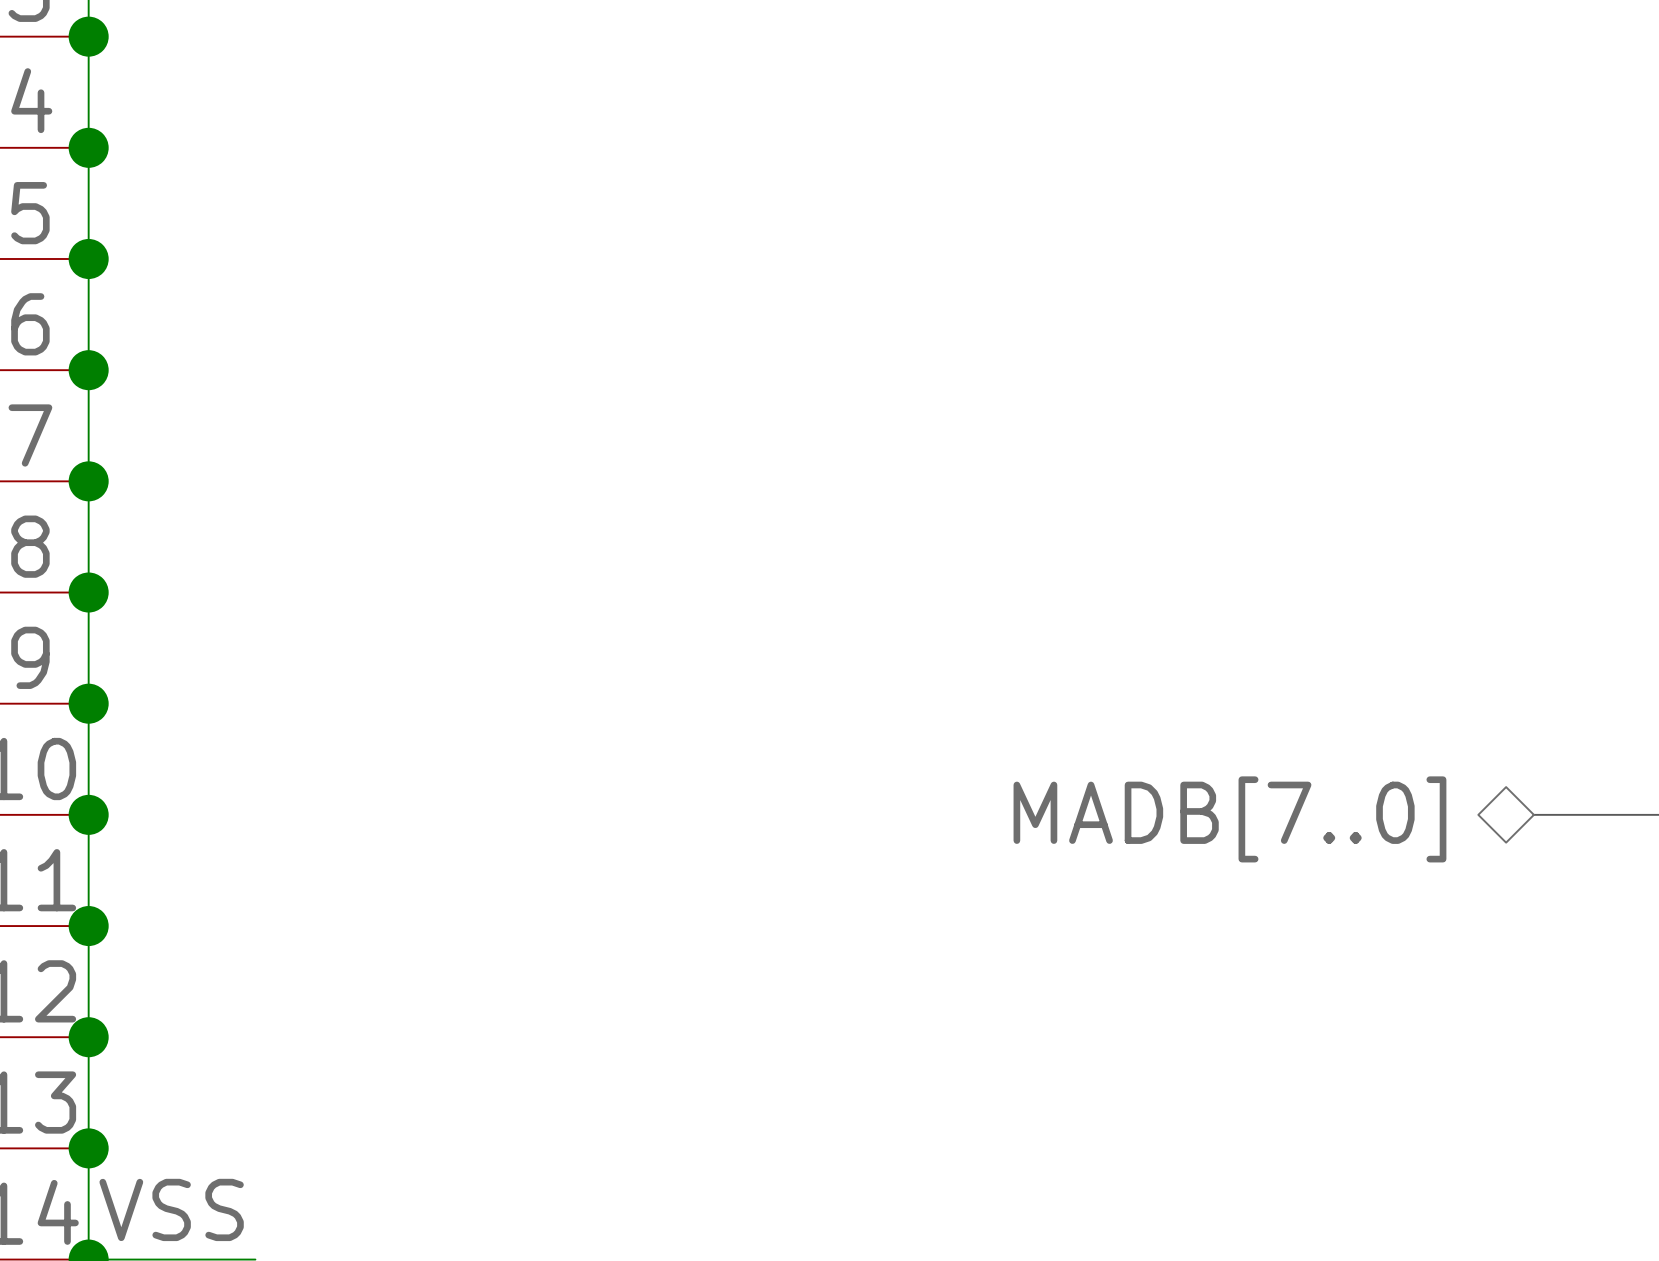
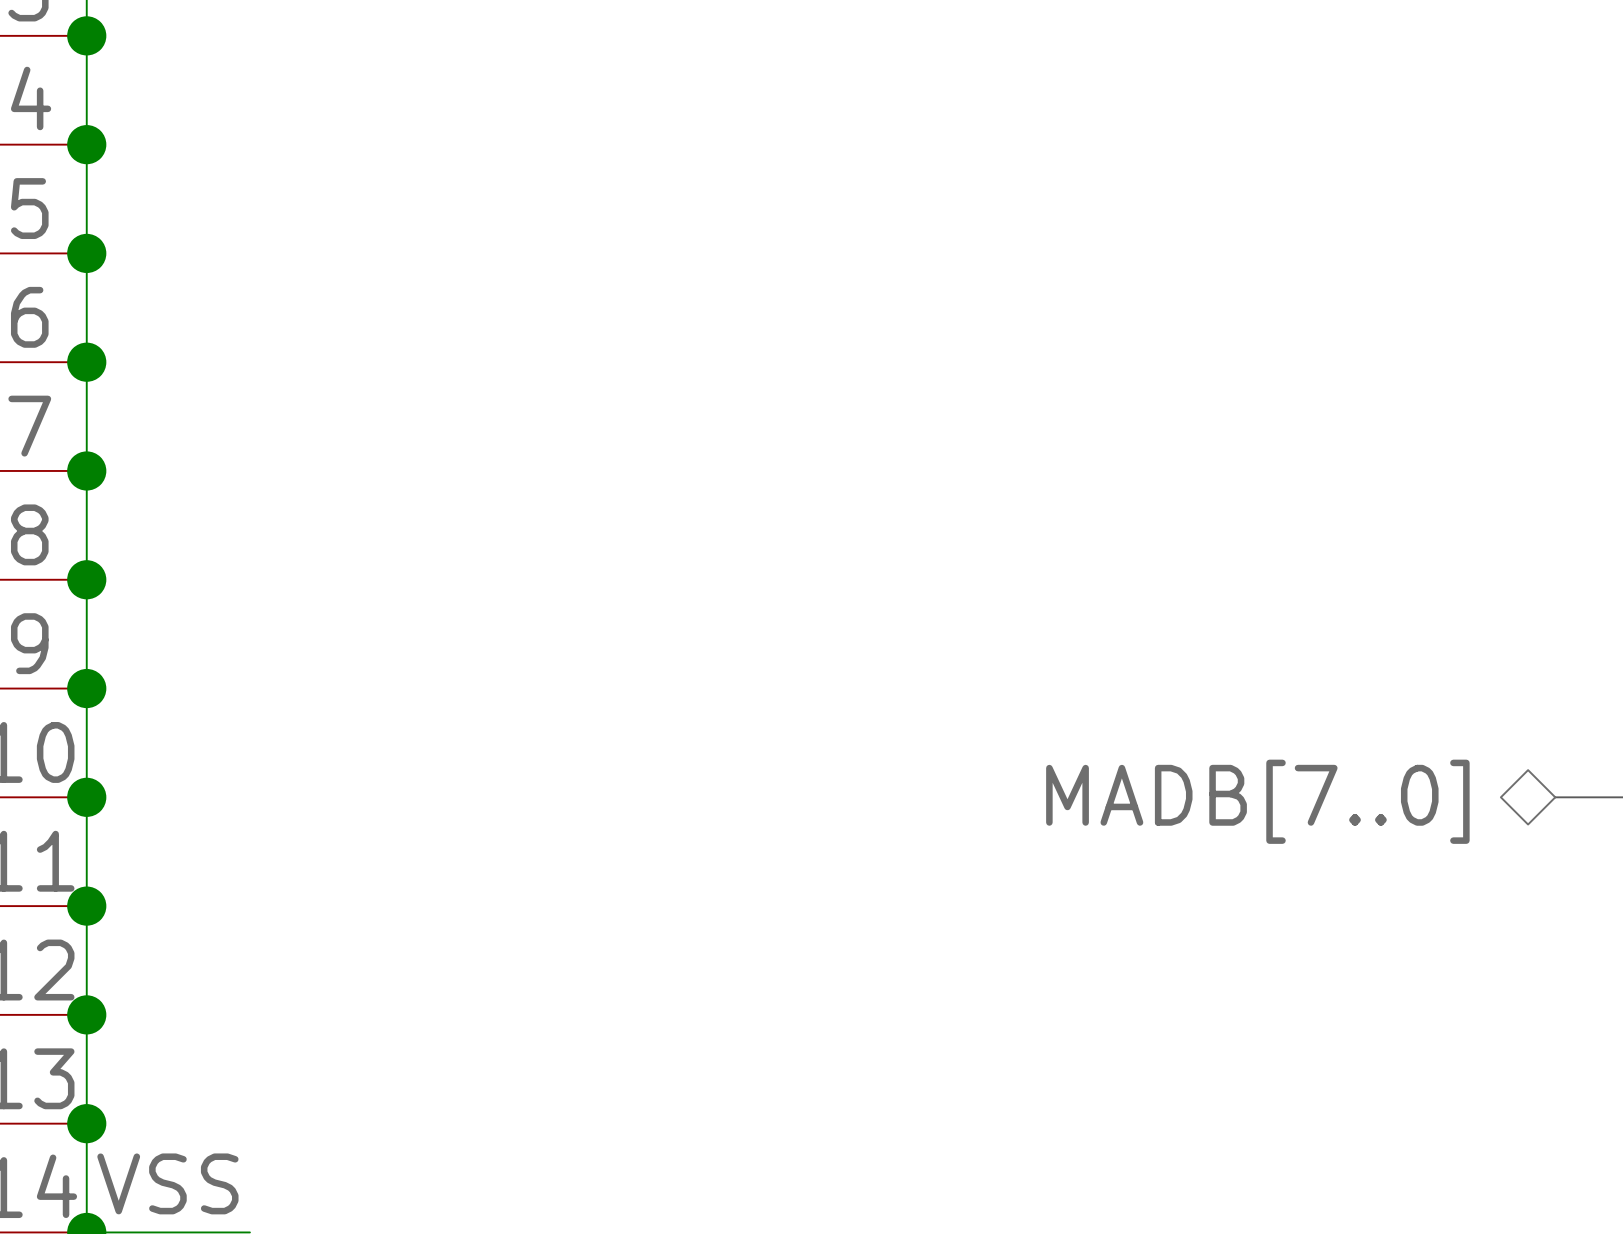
bus: (1533, 814) (1589, 814) -> none
hierarchical label position: MADB[7..0] (1229, 819) -> MADB[7..0] (1257, 801)

